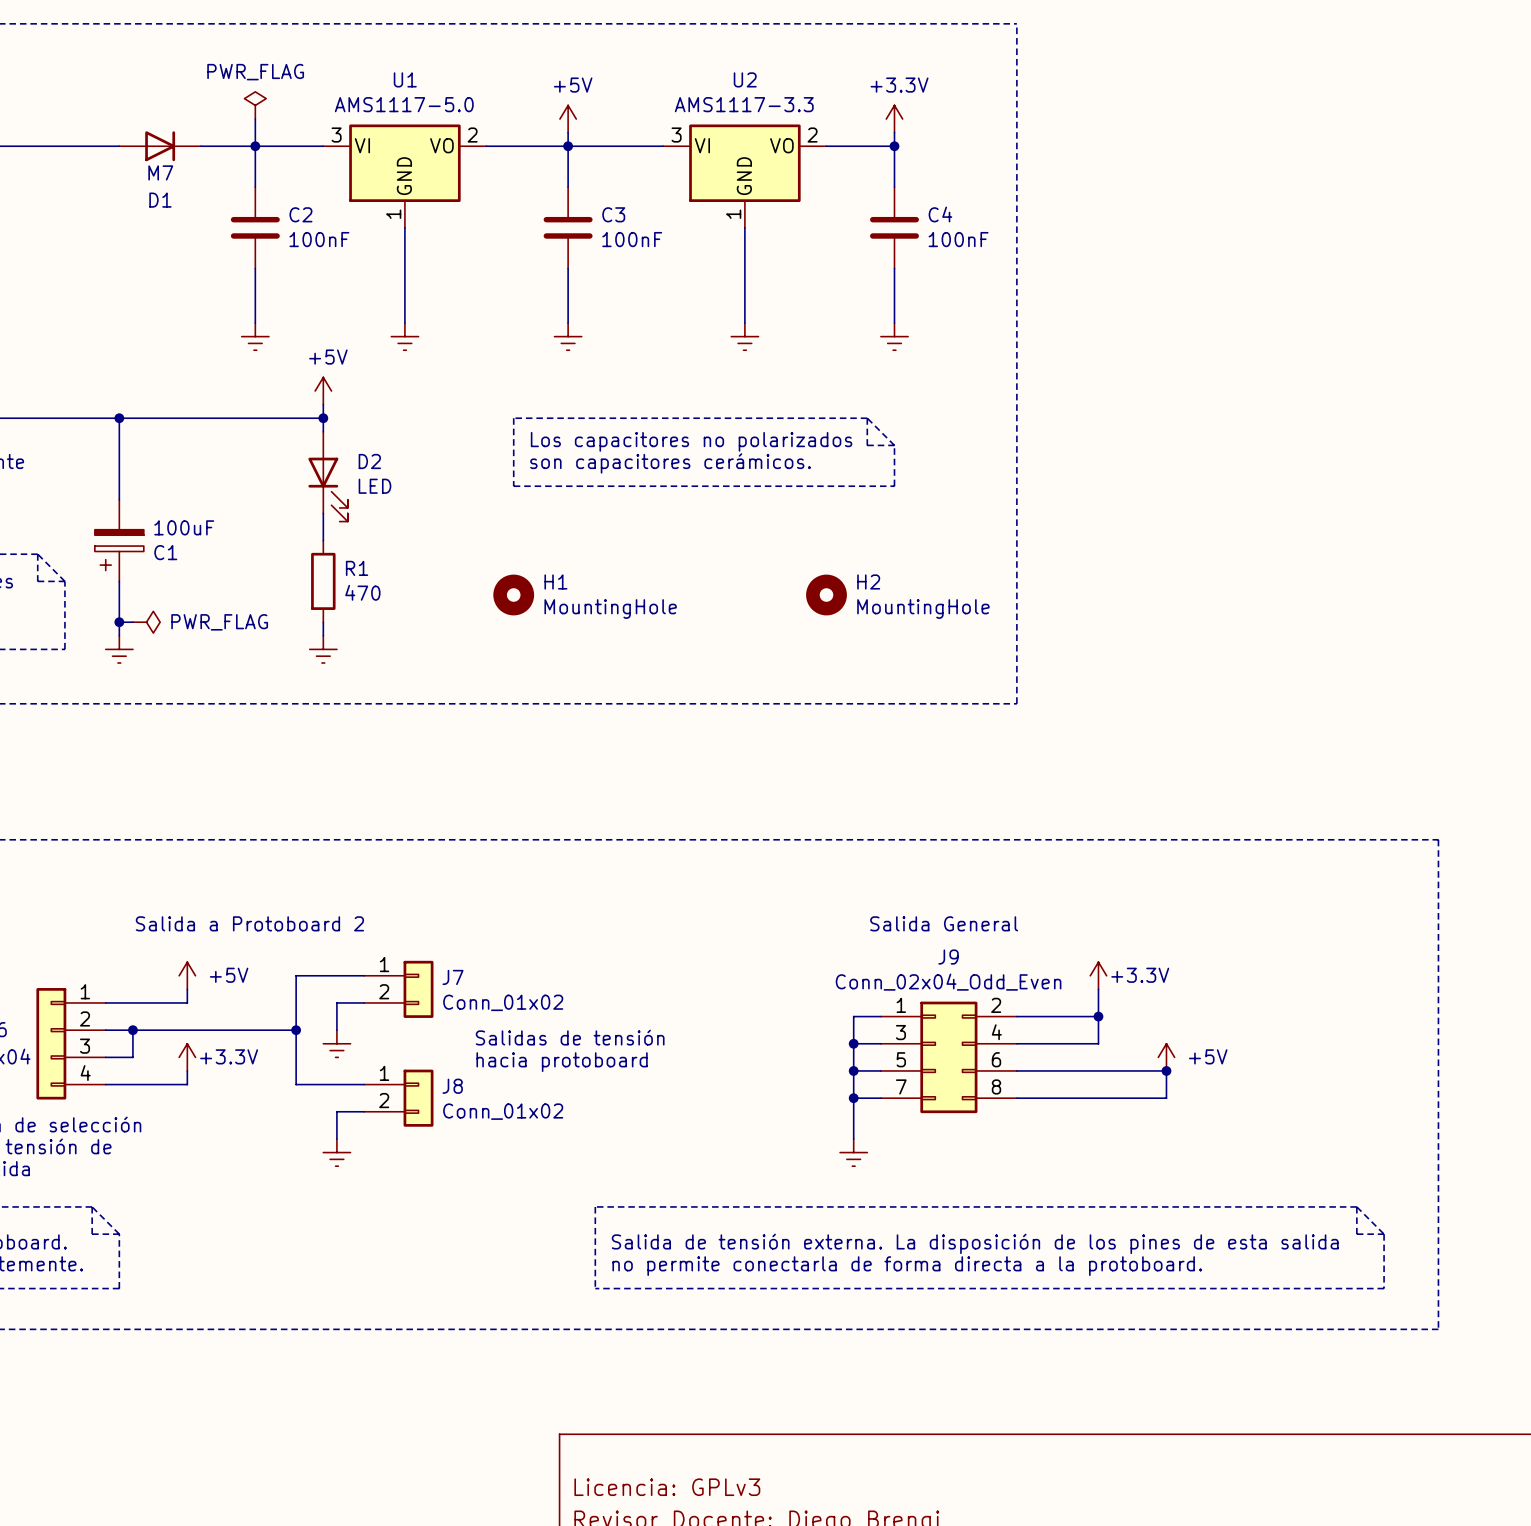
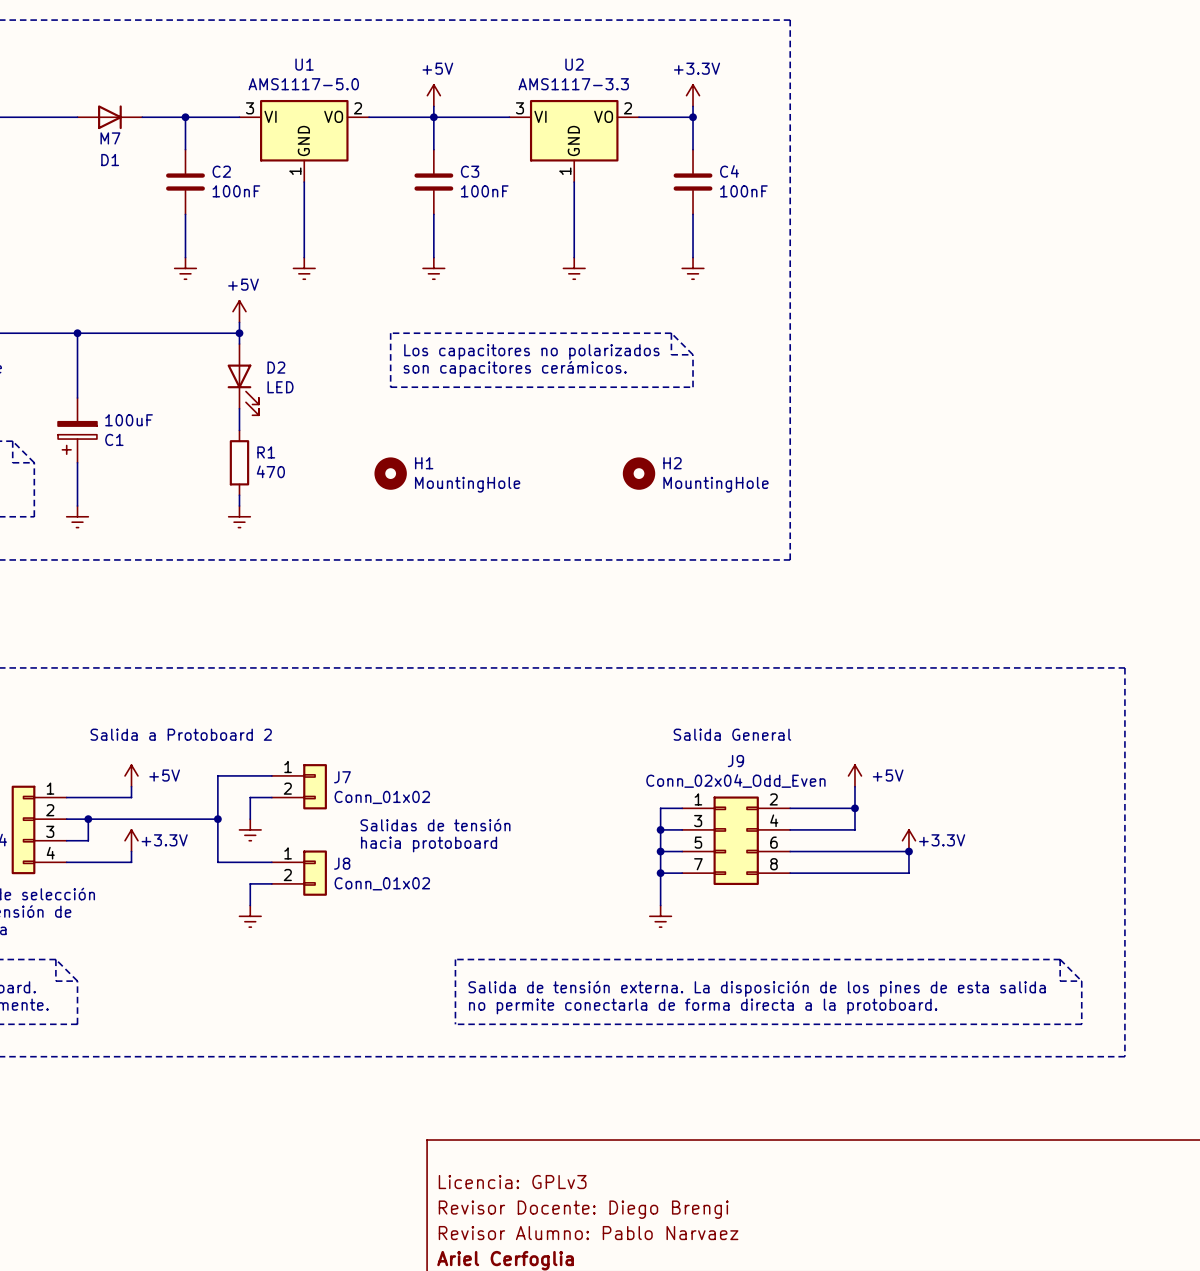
power symbol: PWR_FLAG (255, 105) -> none
wire: (255, 119) (255, 146) -> none
wire: (119, 622) (132, 622) -> none
junction: (119, 622) -> none
power symbol: PWR_FLAG (146, 622) -> none
power symbol: +3.3V (1098, 975) -> +5V (854, 775)
power symbol: +5V (1166, 1057) -> +3.3V (908, 840)

